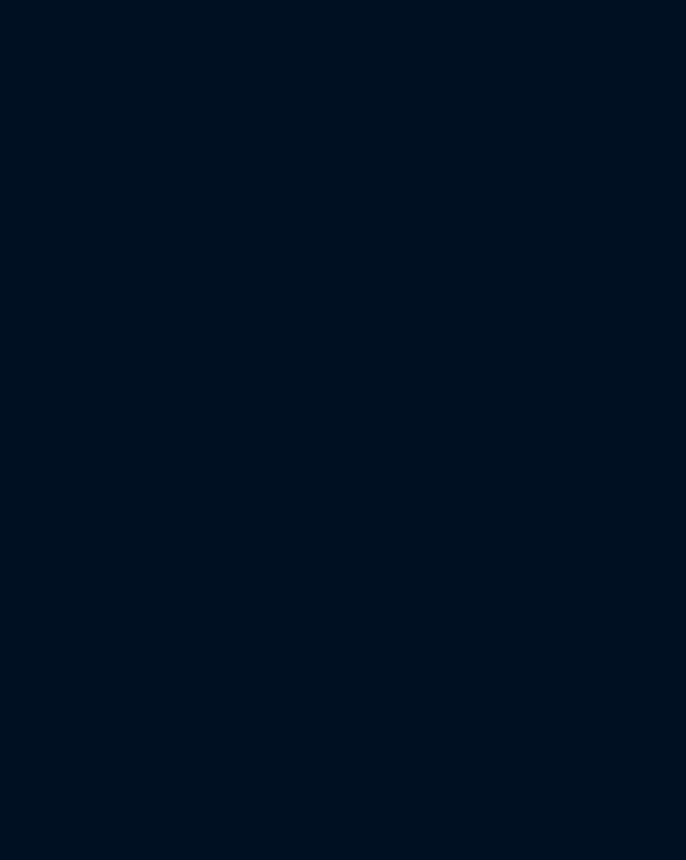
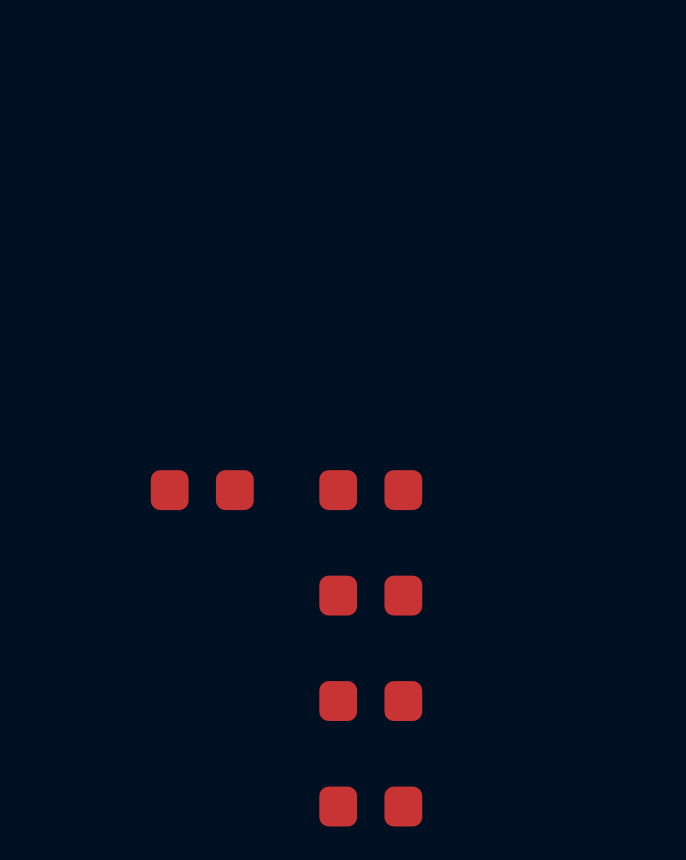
part: none -> (202, 490)
part: none -> (370, 490)
part: none -> (370, 595)
part: none -> (370, 701)
part: none -> (370, 806)

